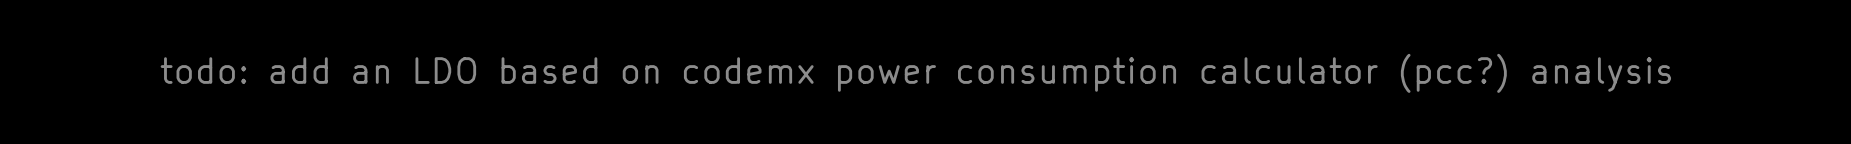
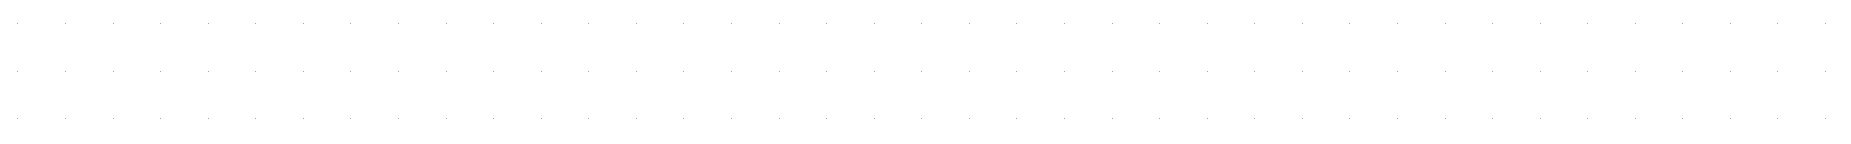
text: todo: add an LDO based on codemx power consumption calculator (pcc?) analysis (915, 73) -> none

